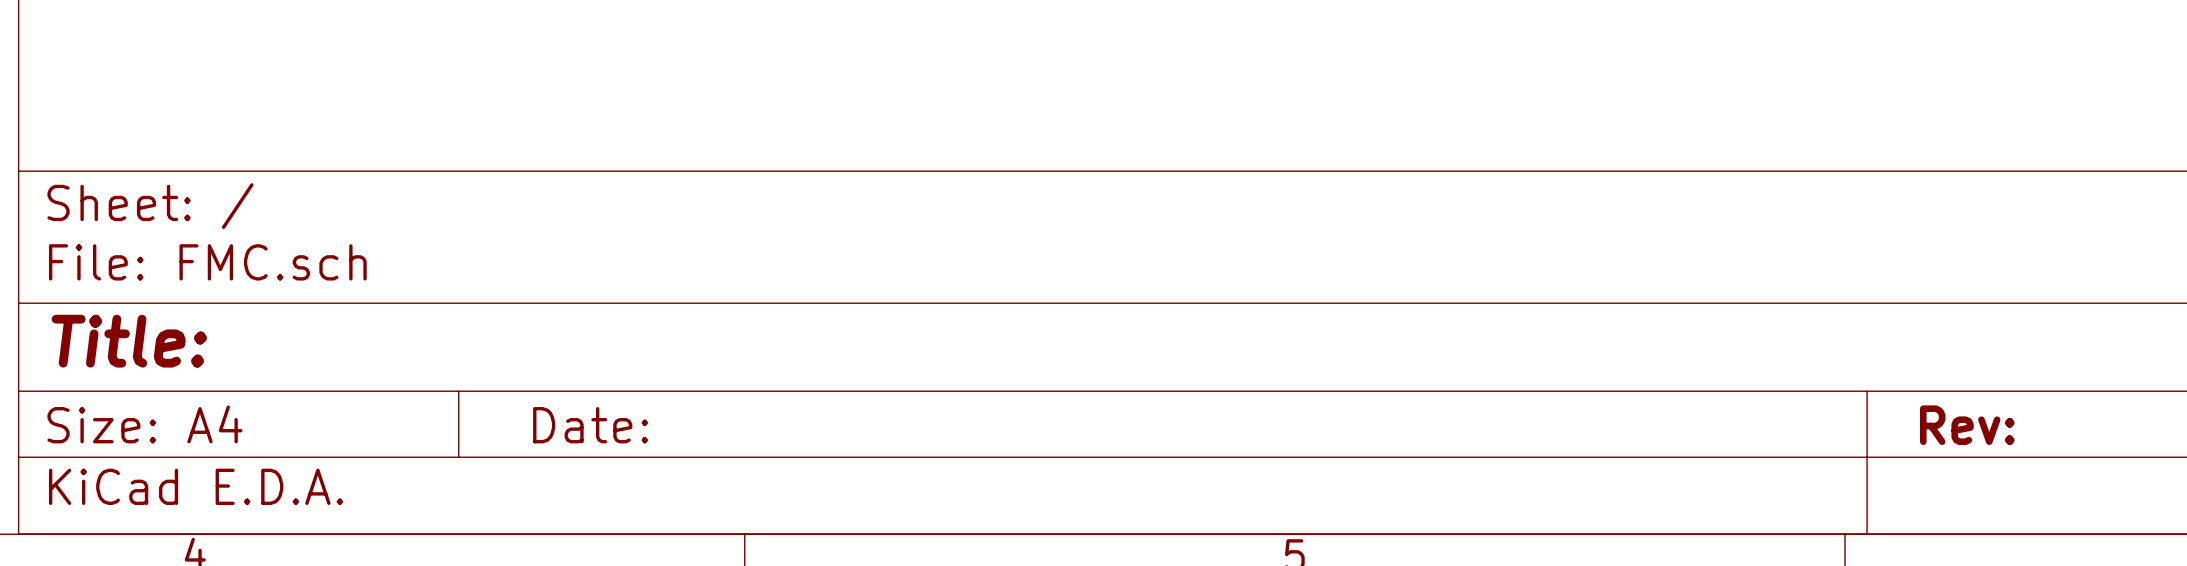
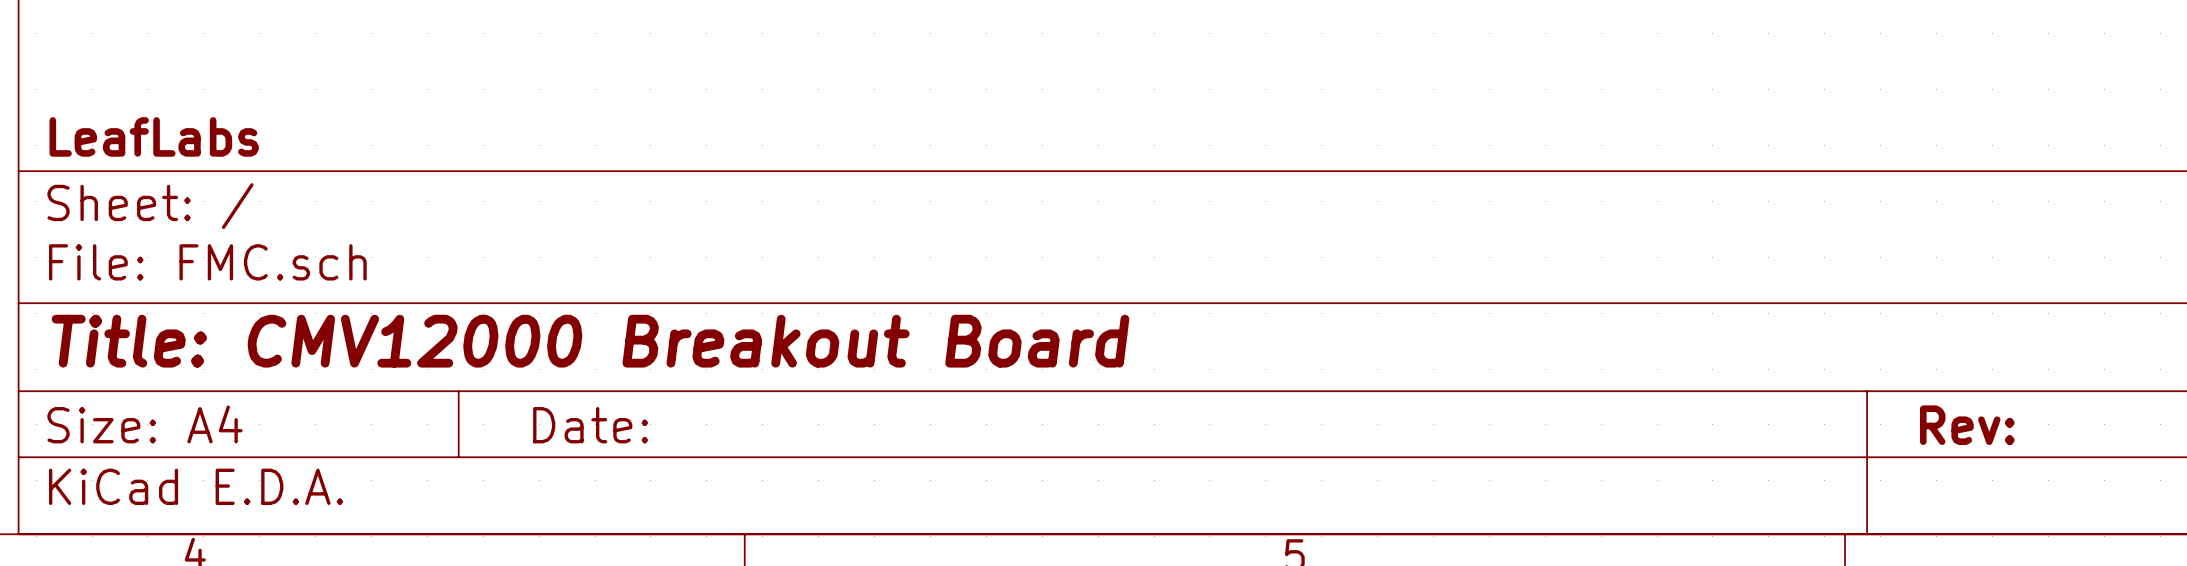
title block: none -> LeafLabs (154, 136)
title block: Title: (129, 341) -> Title: CMV12000 Breakout Board (590, 341)

